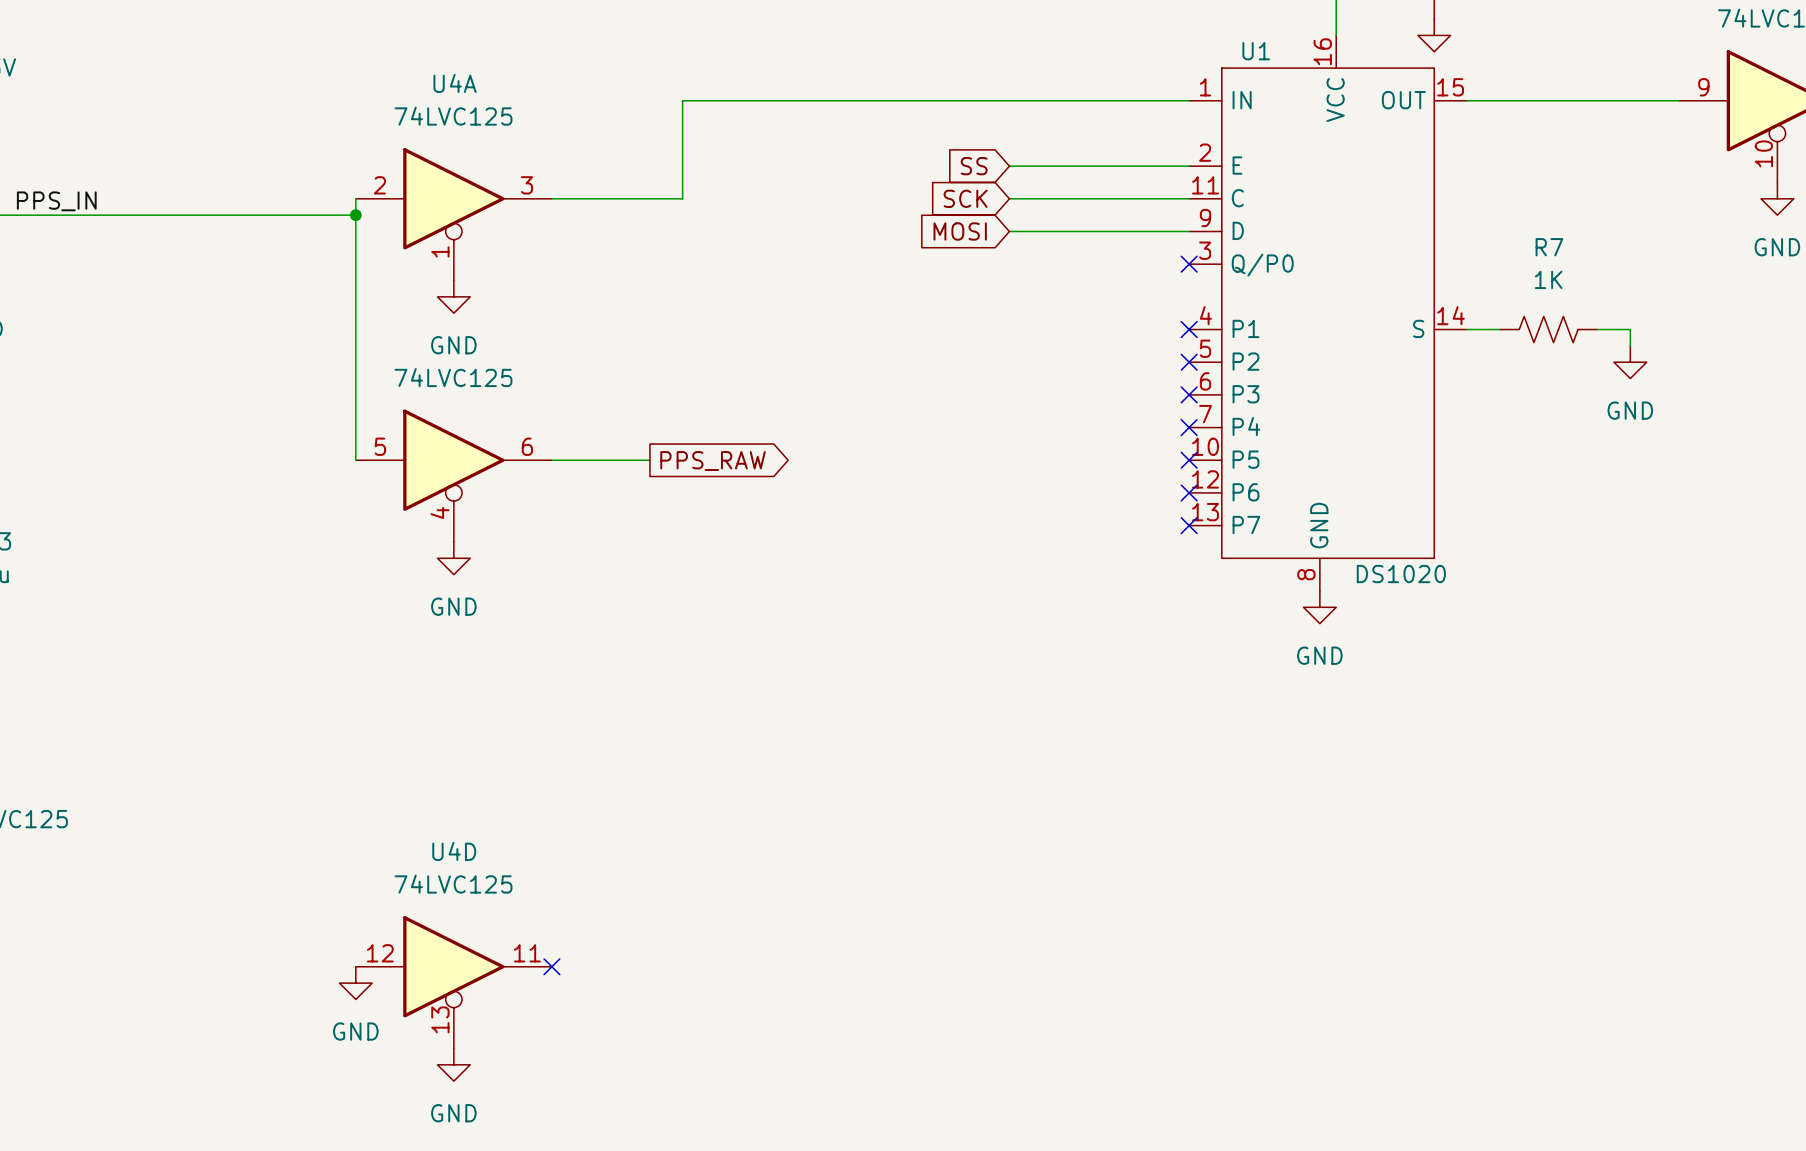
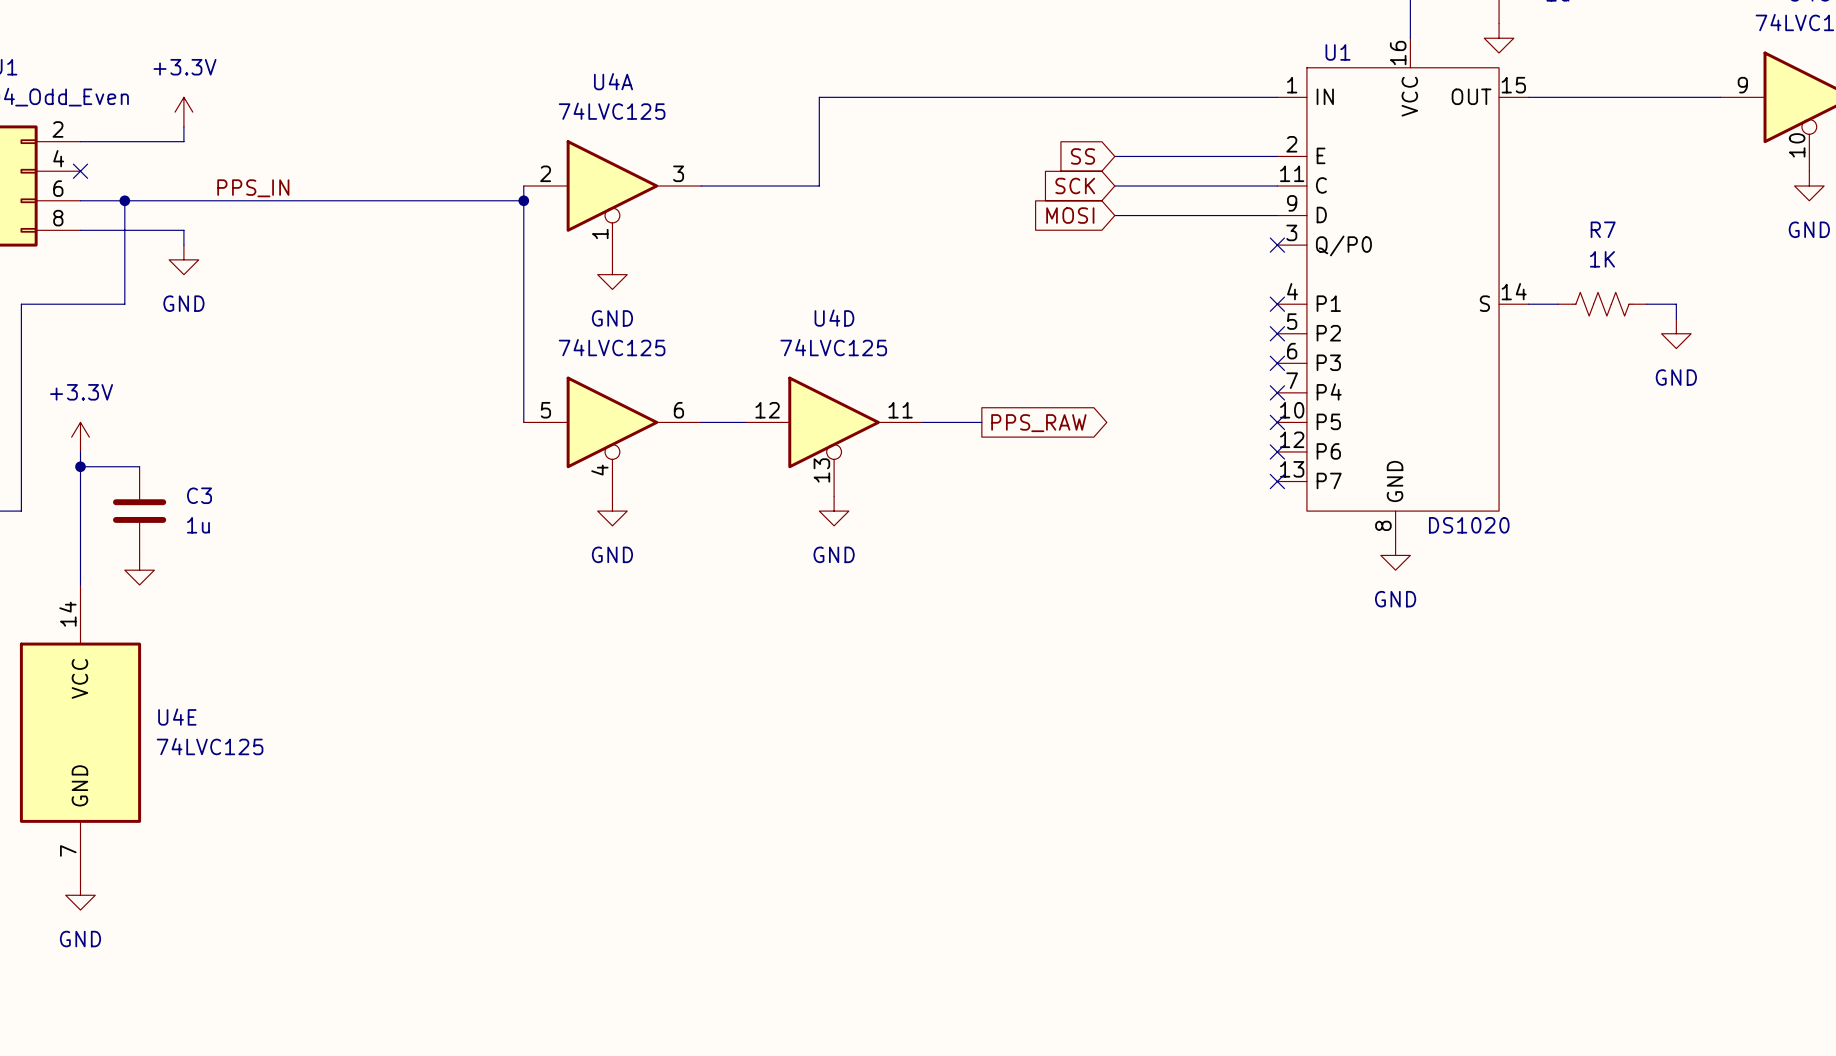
wire: none -> (922, 422) (981, 422)
global label position: PPS_RAW (713, 461) -> PPS_RAW (1038, 423)
power symbol: none -> GND (834, 511)
no-connect mark: (551, 966) -> none
U4D position: (453, 982) -> (834, 436)
power symbol: GND (355, 983) -> none
power symbol: GND (453, 1064) -> none

